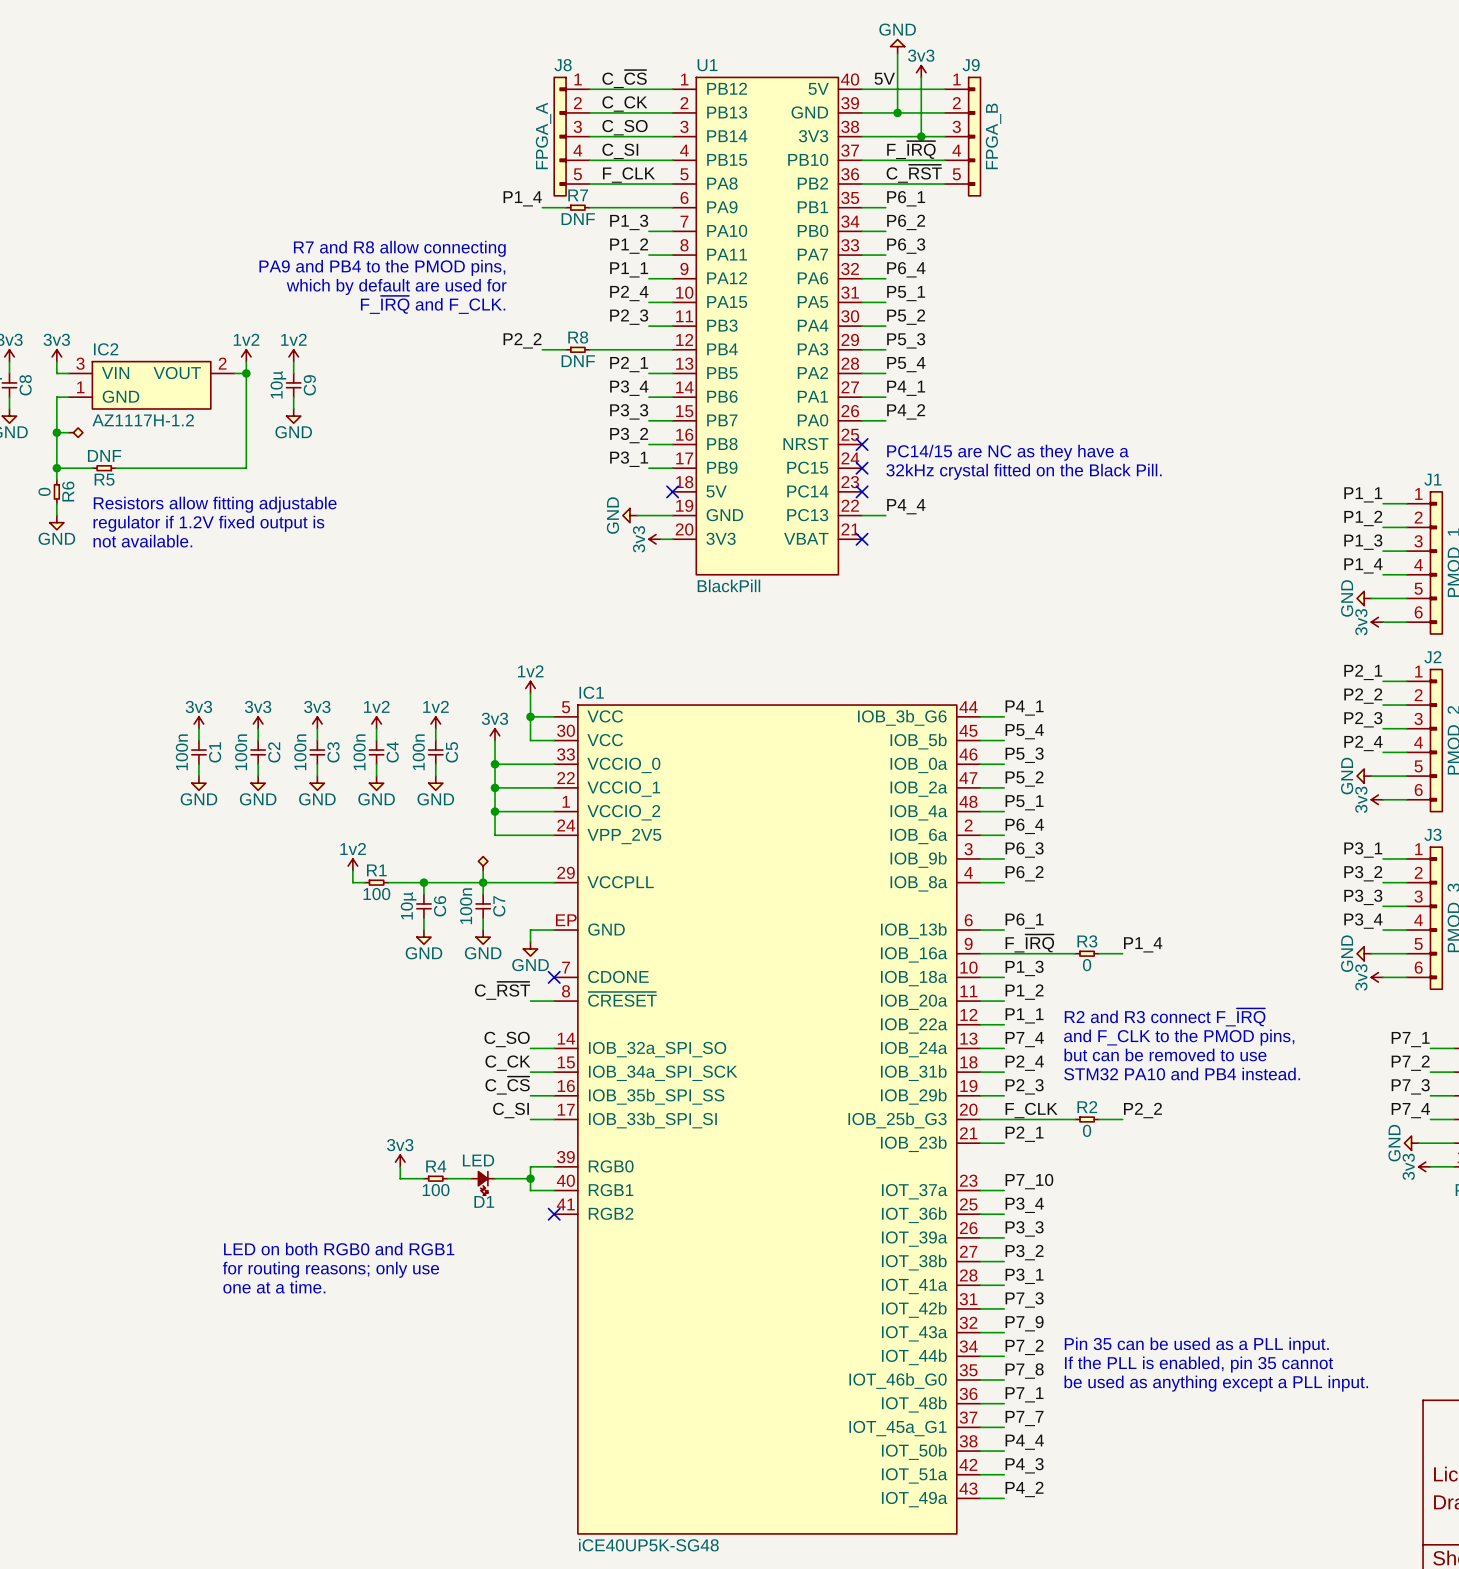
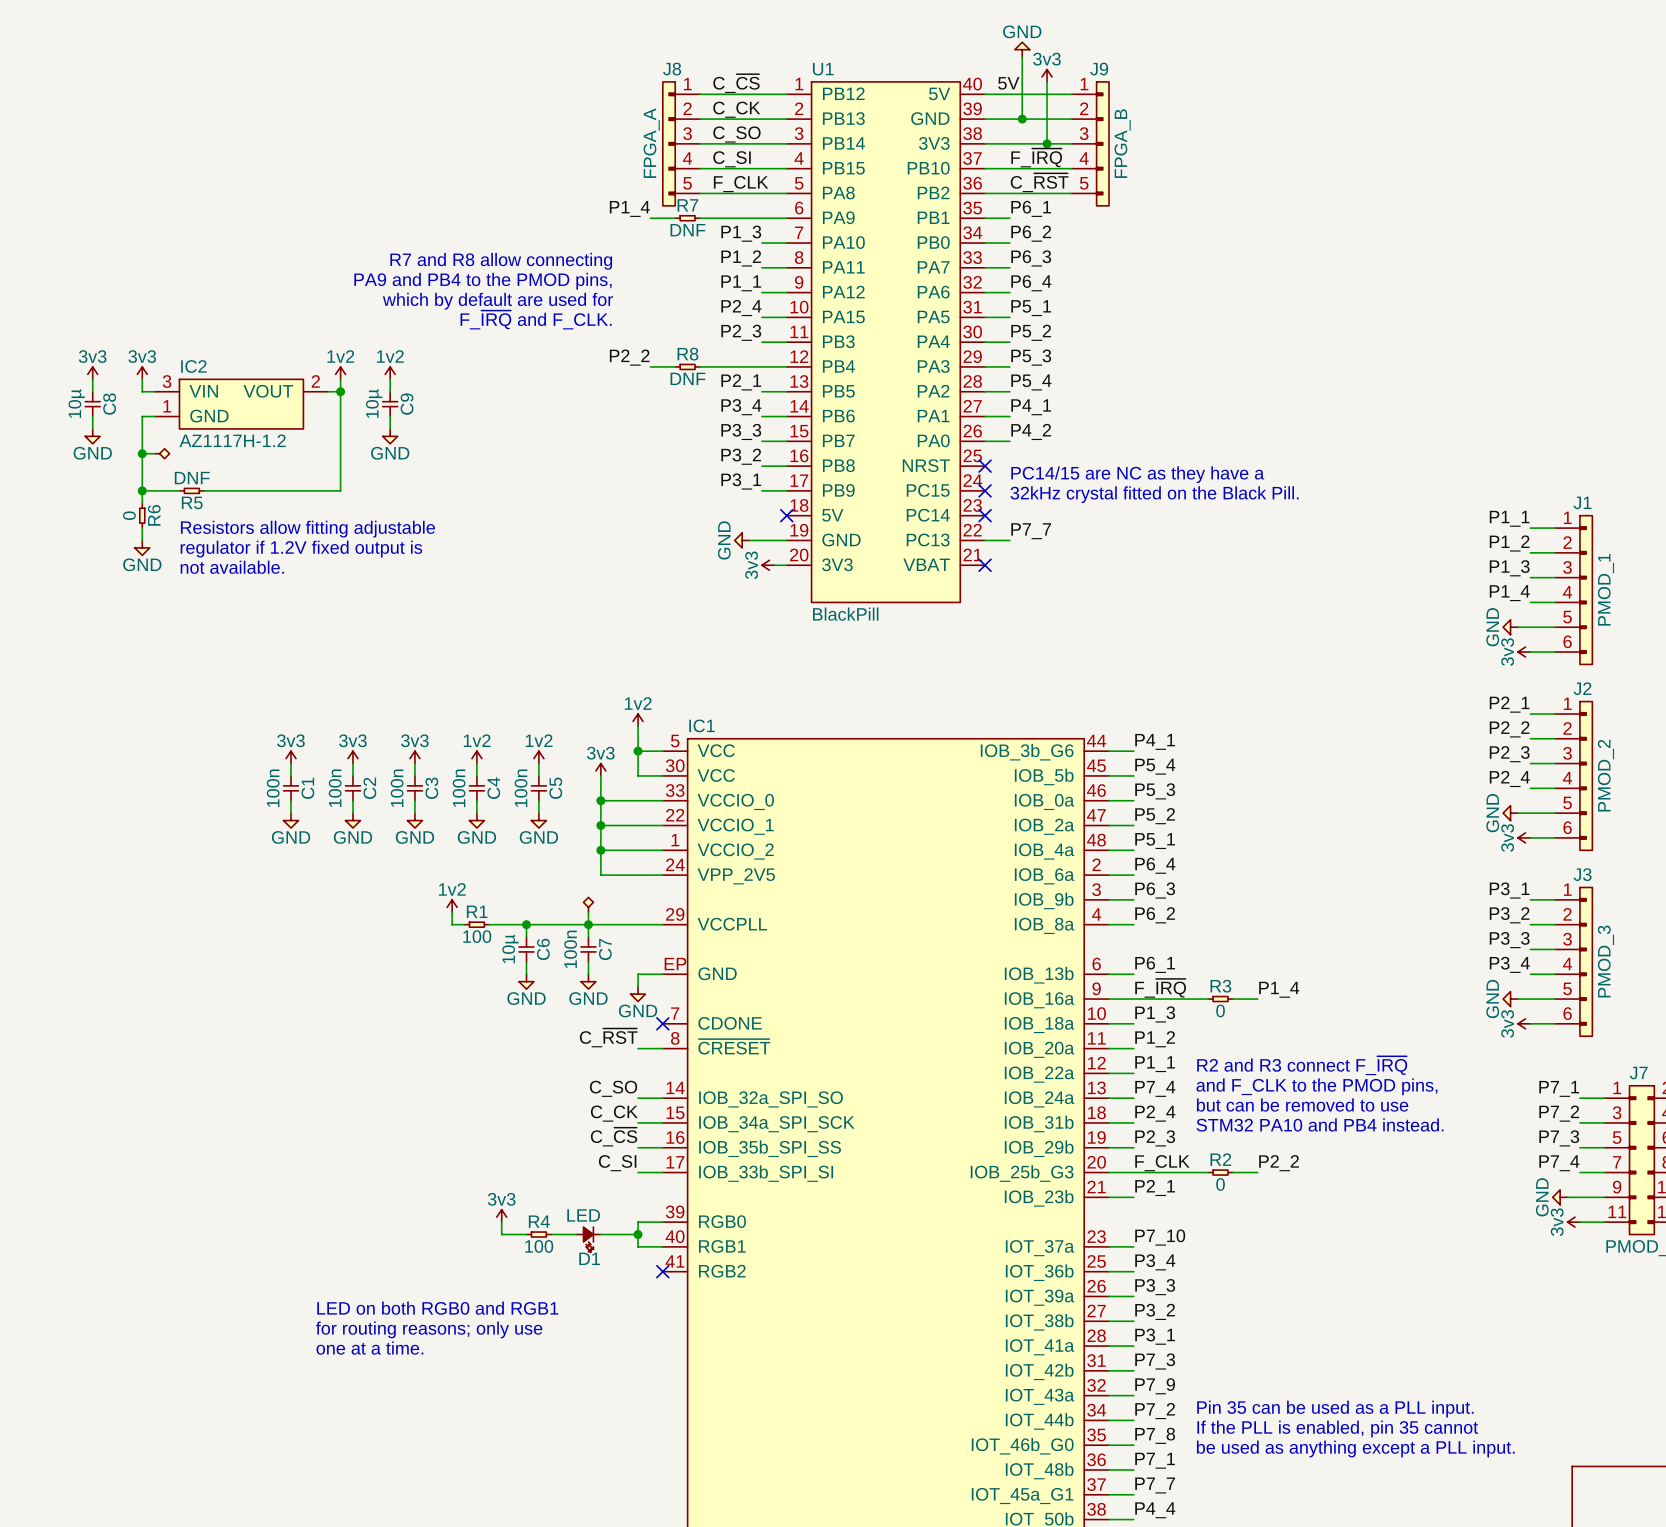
label: P4_4 (906, 506) -> P7_7 (1031, 531)

